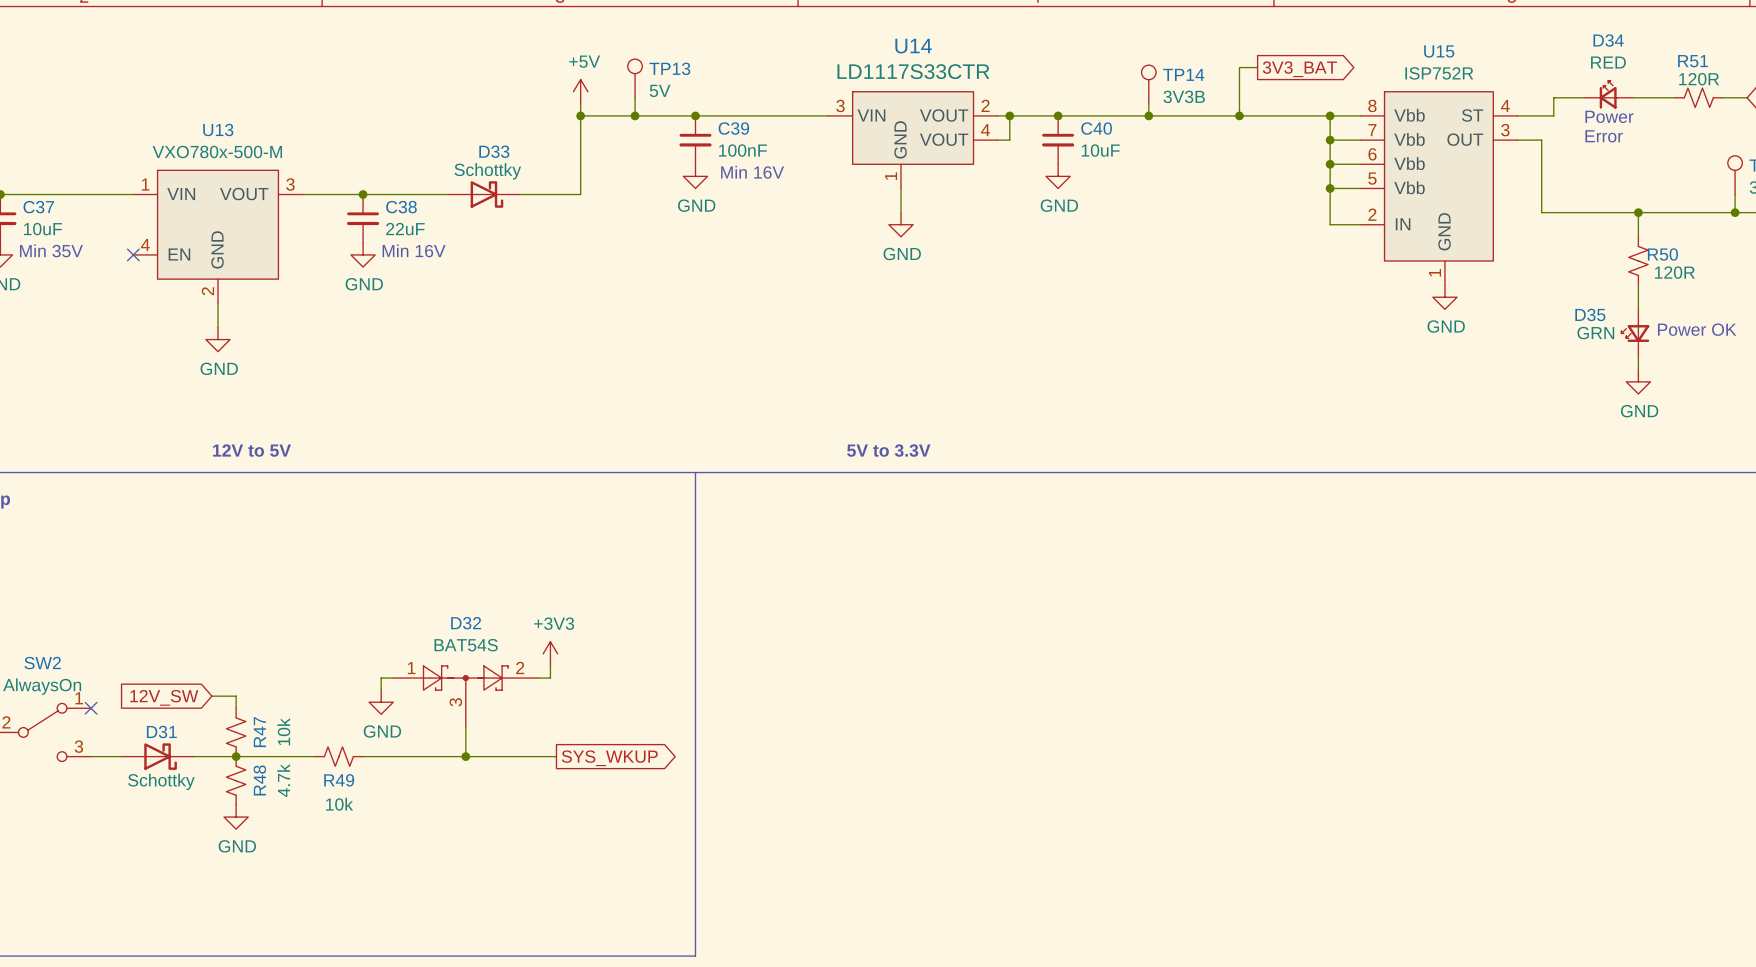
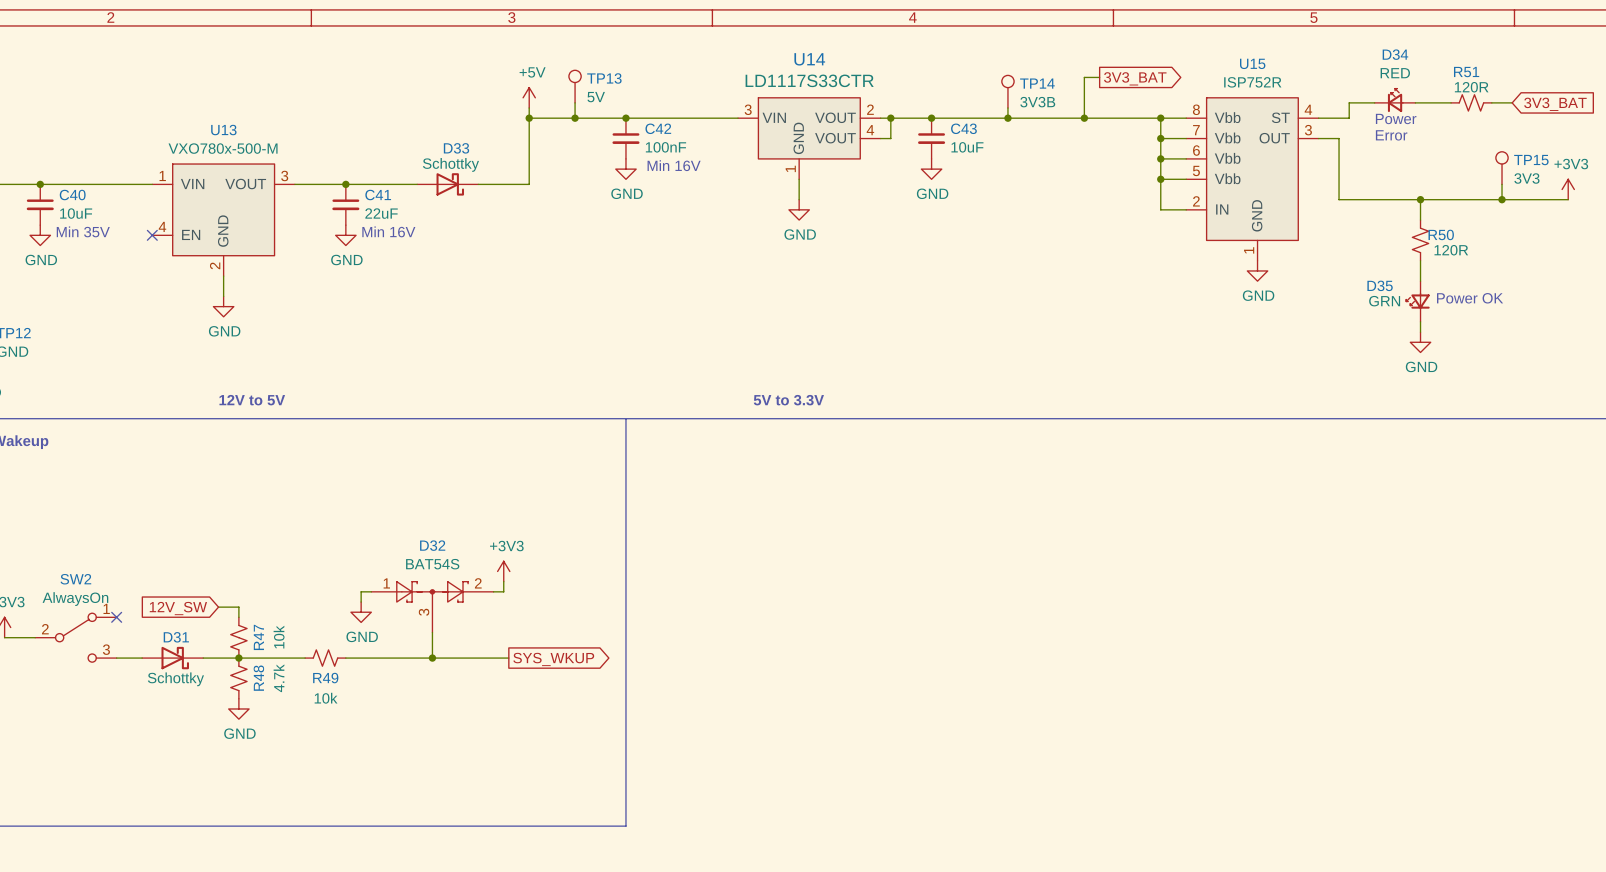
C39 name: C39 (733, 128) -> C42 (658, 128)
C40 name: C40 (1096, 128) -> C43 (963, 128)
C37 name: C37 (38, 207) -> C40 (72, 195)
C38 name: C38 (401, 207) -> C41 (378, 195)

